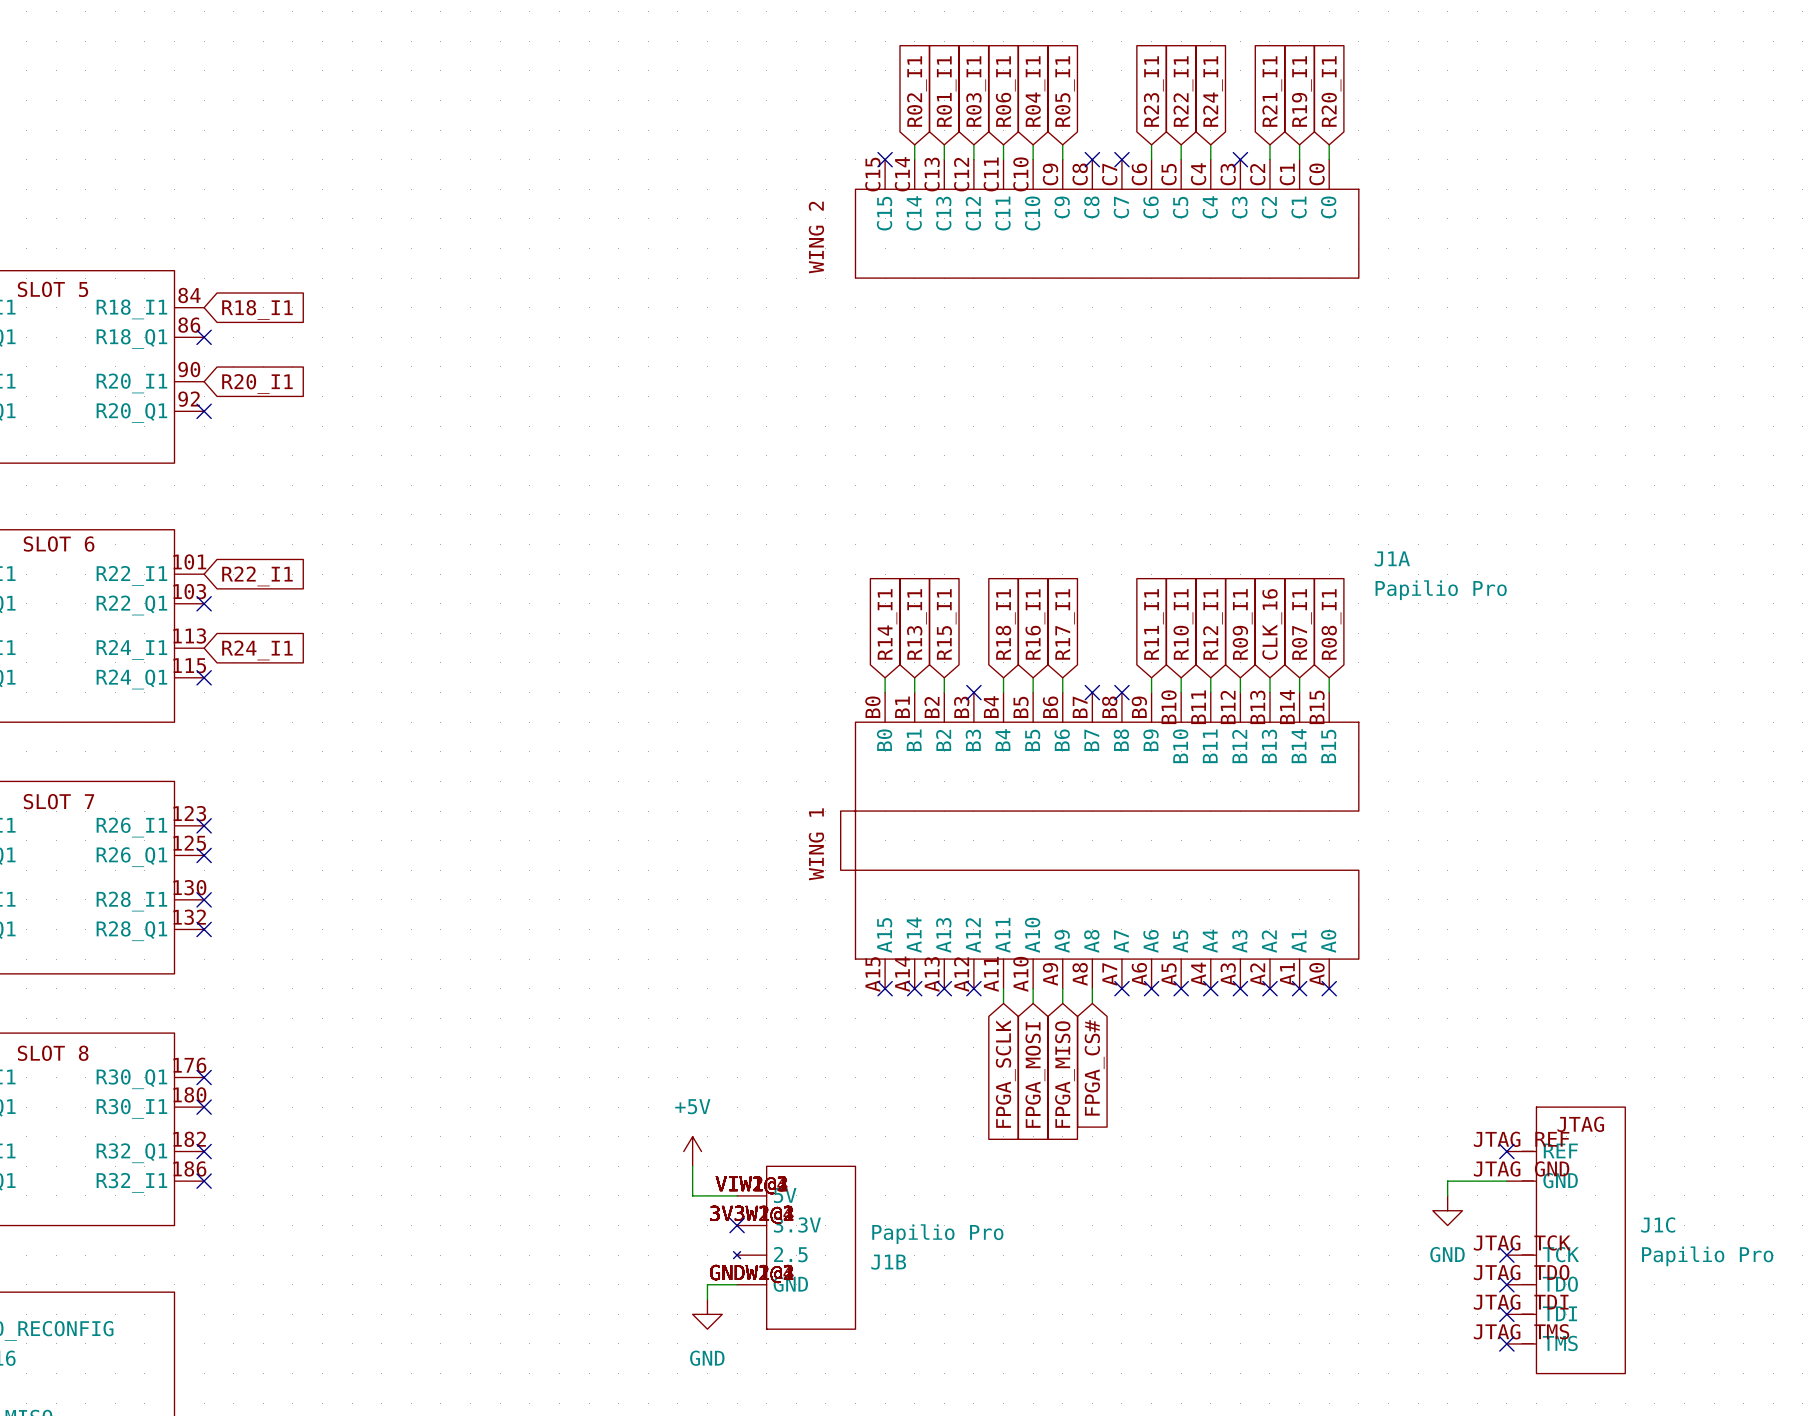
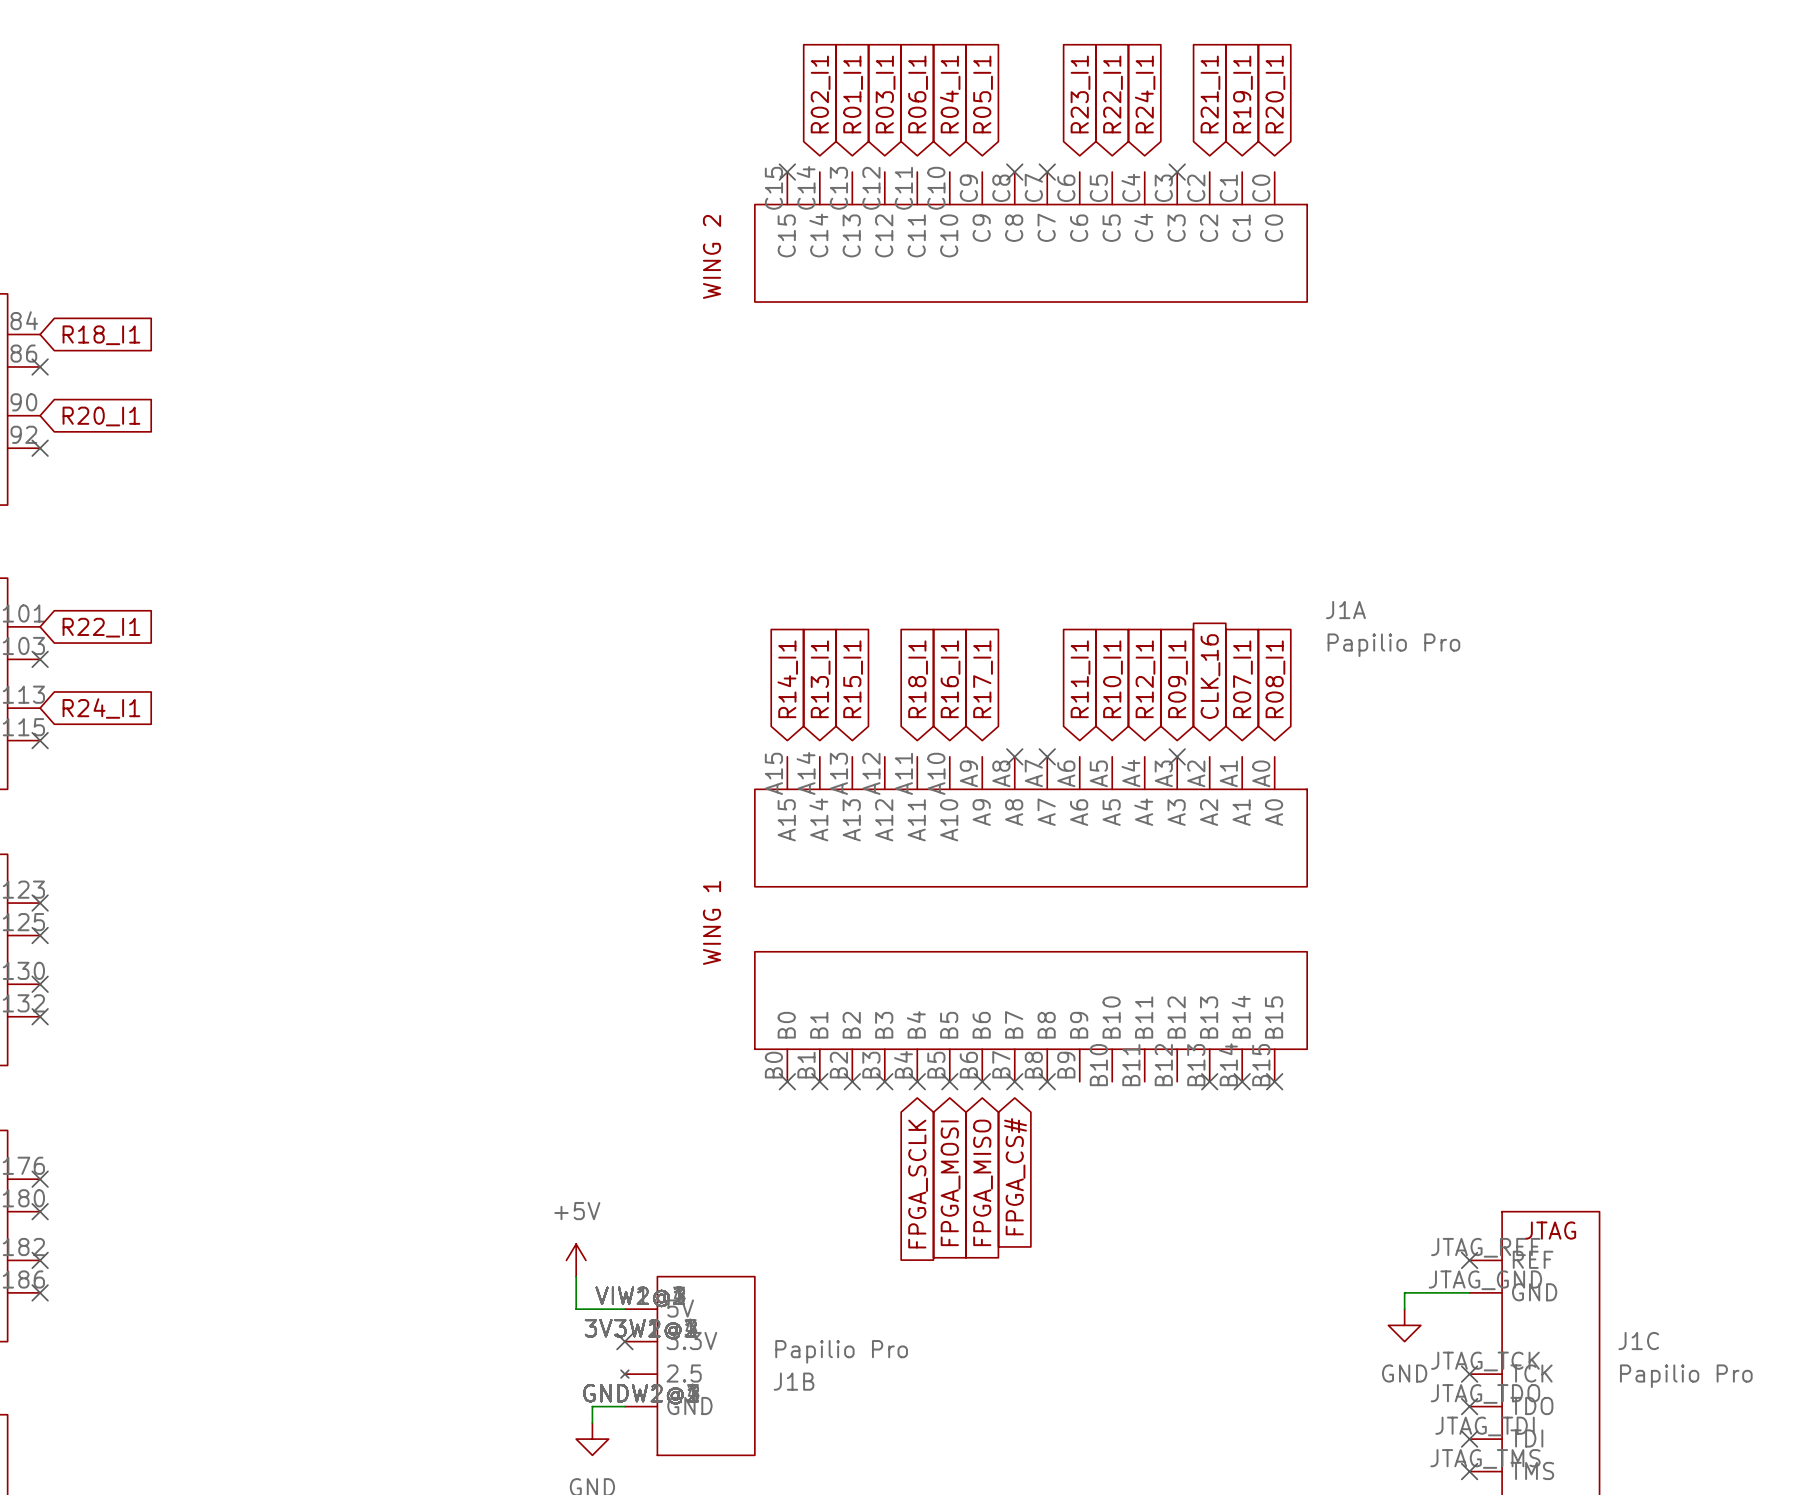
wire: (914, 144) (914, 159) -> none
wire: (944, 144) (944, 159) -> none
wire: (973, 144) (973, 159) -> none
wire: (1003, 144) (1003, 159) -> none
wire: (1033, 144) (1033, 159) -> none
wire: (1062, 144) (1062, 159) -> none
wire: (1151, 144) (1151, 159) -> none
wire: (1181, 144) (1181, 159) -> none
wire: (1210, 144) (1210, 159) -> none
wire: (1269, 144) (1269, 159) -> none
wire: (1299, 144) (1299, 159) -> none
wire: (1329, 144) (1329, 159) -> none
J1A symbol: [840, 159, 1359, 989] -> [754, 172, 1308, 1082]
wire: (885, 677) (885, 692) -> none
wire: (914, 677) (914, 692) -> none
wire: (944, 677) (944, 692) -> none
wire: (1003, 677) (1003, 692) -> none
wire: (1033, 677) (1033, 692) -> none
wire: (1062, 677) (1062, 692) -> none
wire: (1151, 677) (1151, 692) -> none
wire: (1181, 677) (1181, 692) -> none
wire: (1210, 677) (1210, 692) -> none
wire: (1240, 677) (1240, 692) -> none
wire: (1269, 677) (1269, 692) -> none
wire: (1299, 677) (1299, 692) -> none
wire: (1329, 677) (1329, 692) -> none
no-connect mark: (973, 692) -> none
no-connect mark: none -> (1177, 756)
wire: (1003, 988) (1003, 1003) -> none
no-connect mark: none -> (917, 1081)
wire: (1033, 988) (1033, 1003) -> none
no-connect mark: none -> (949, 1081)
wire: (1062, 988) (1062, 1003) -> none
no-connect mark: none -> (982, 1081)
wire: (1092, 988) (1092, 1003) -> none
no-connect mark: none -> (1014, 1081)
no-connect mark: (1151, 988) -> none
no-connect mark: (1181, 988) -> none
no-connect mark: (1210, 988) -> none
no-connect mark: (1240, 988) -> none

